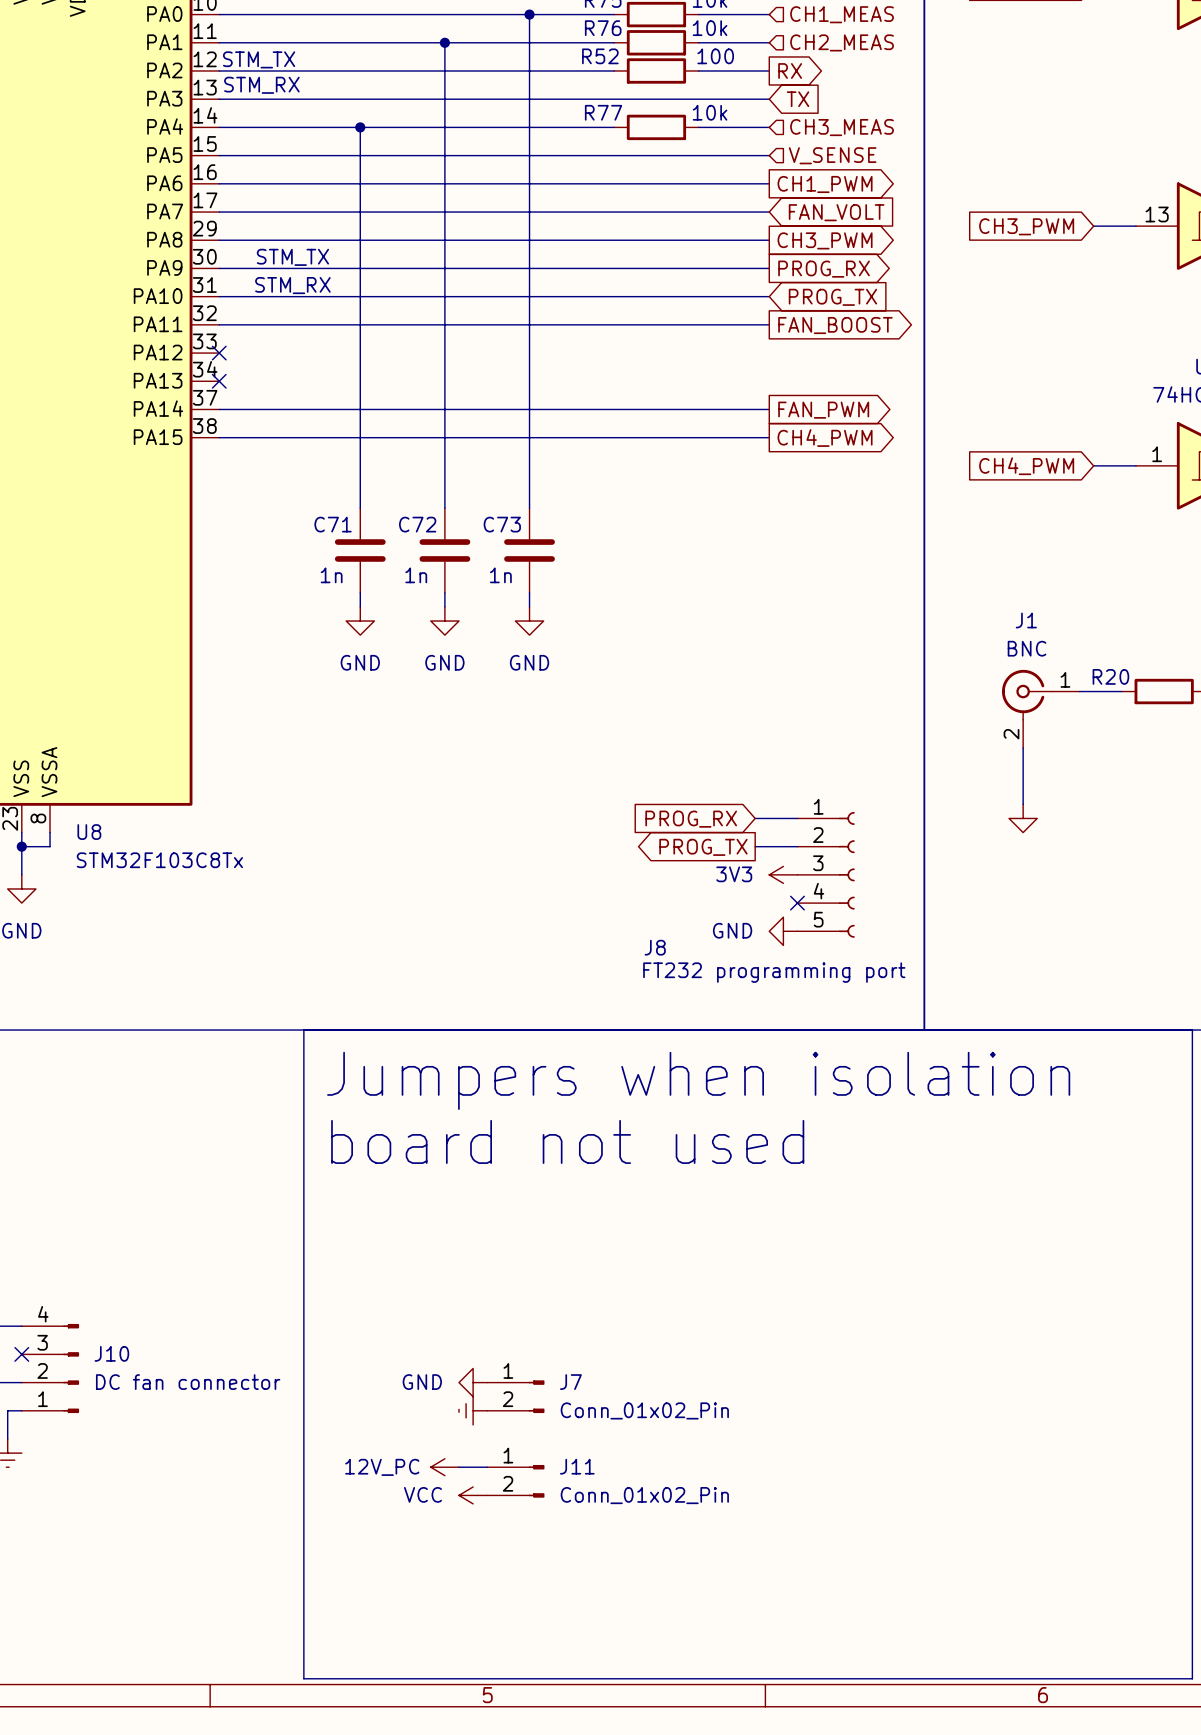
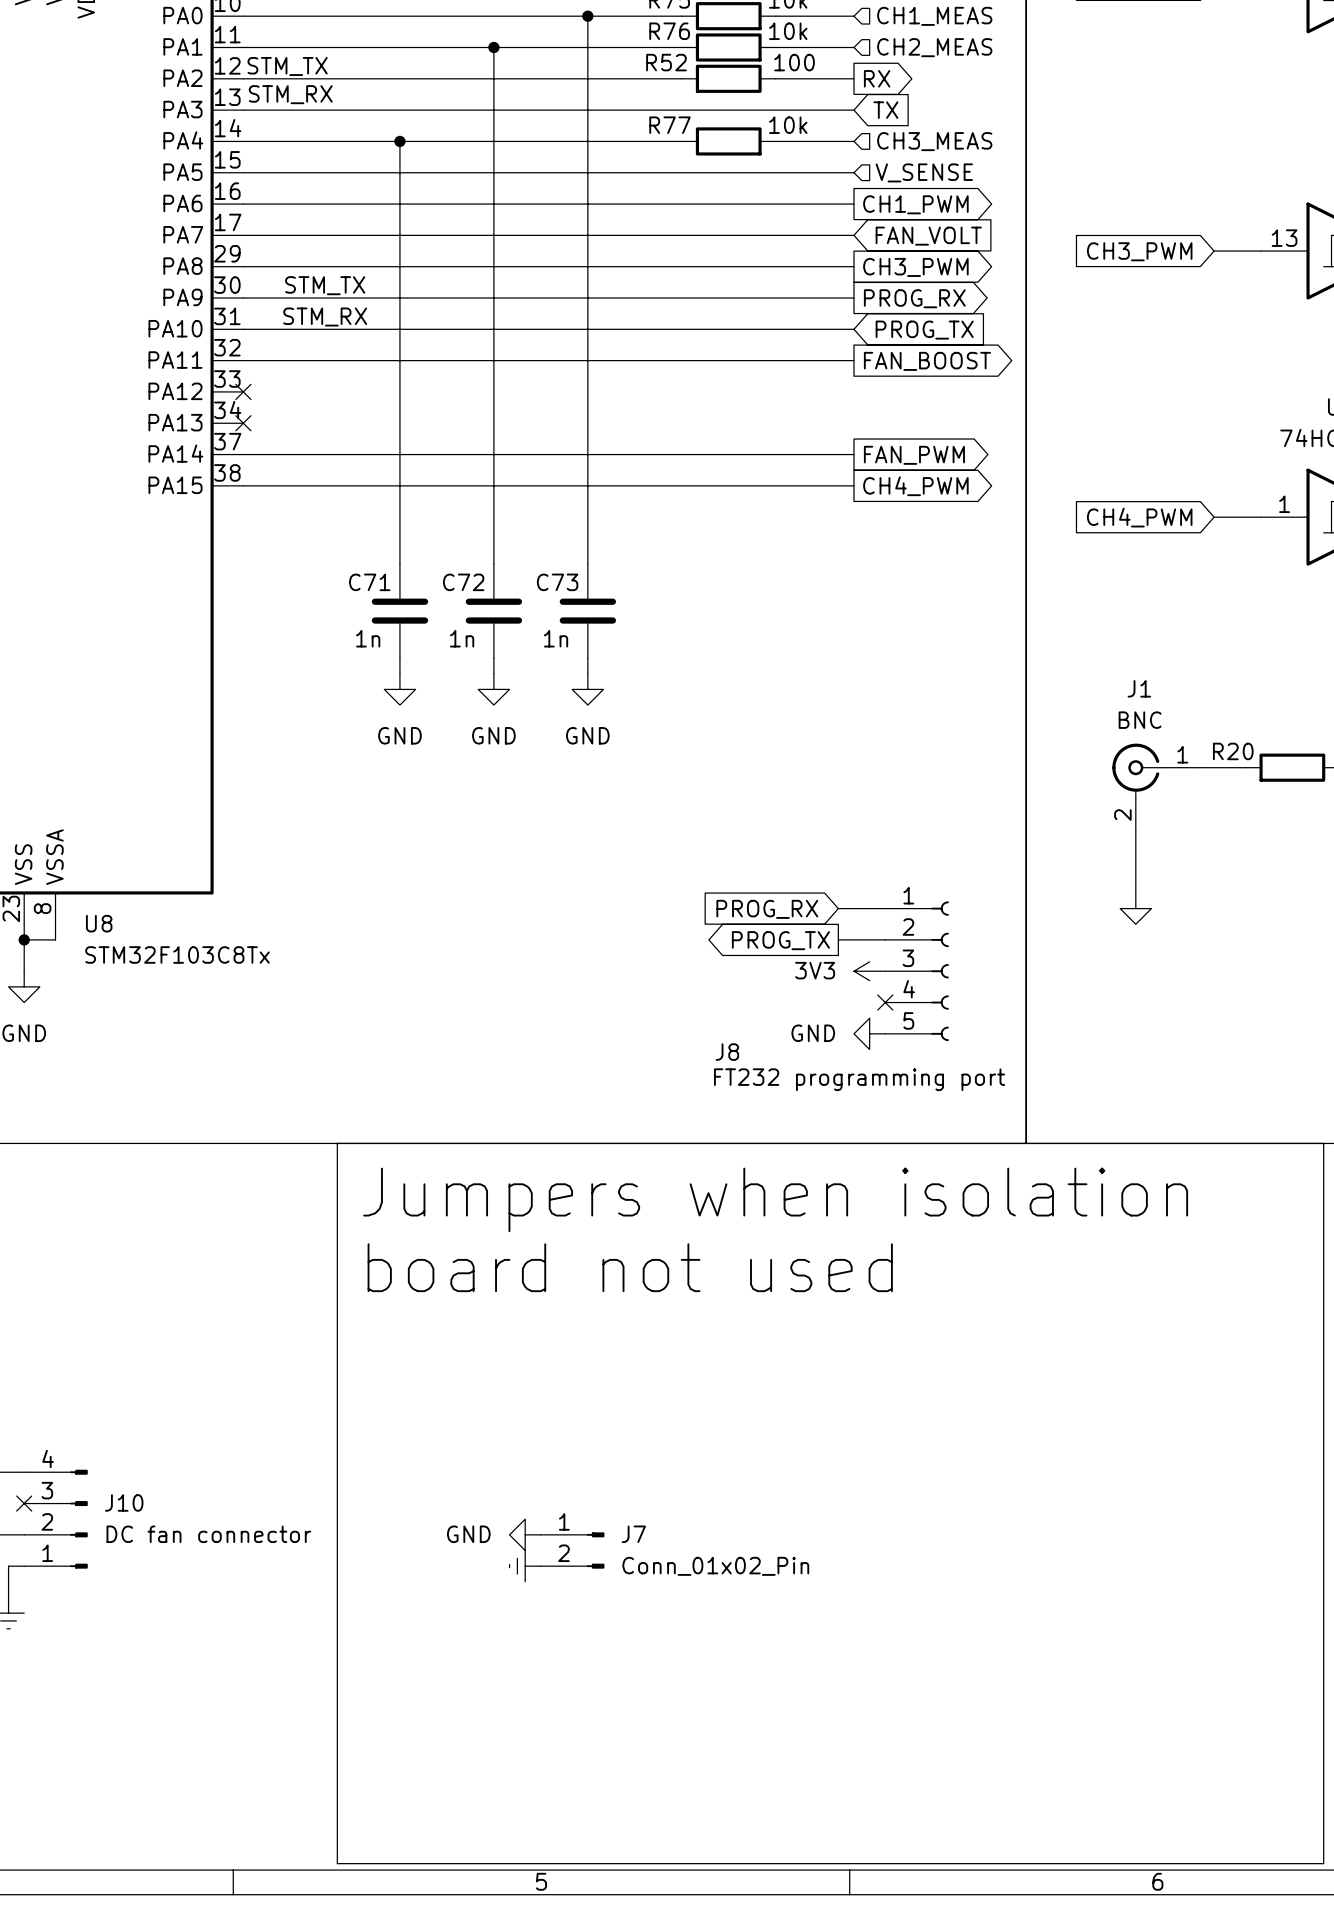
power symbol: 12V_PC (444, 1467) -> none
wire: (459, 1467) (487, 1467) -> none
J11: Conn_01x02_Pin (515, 1481) -> none
power symbol: VCC (473, 1495) -> none

